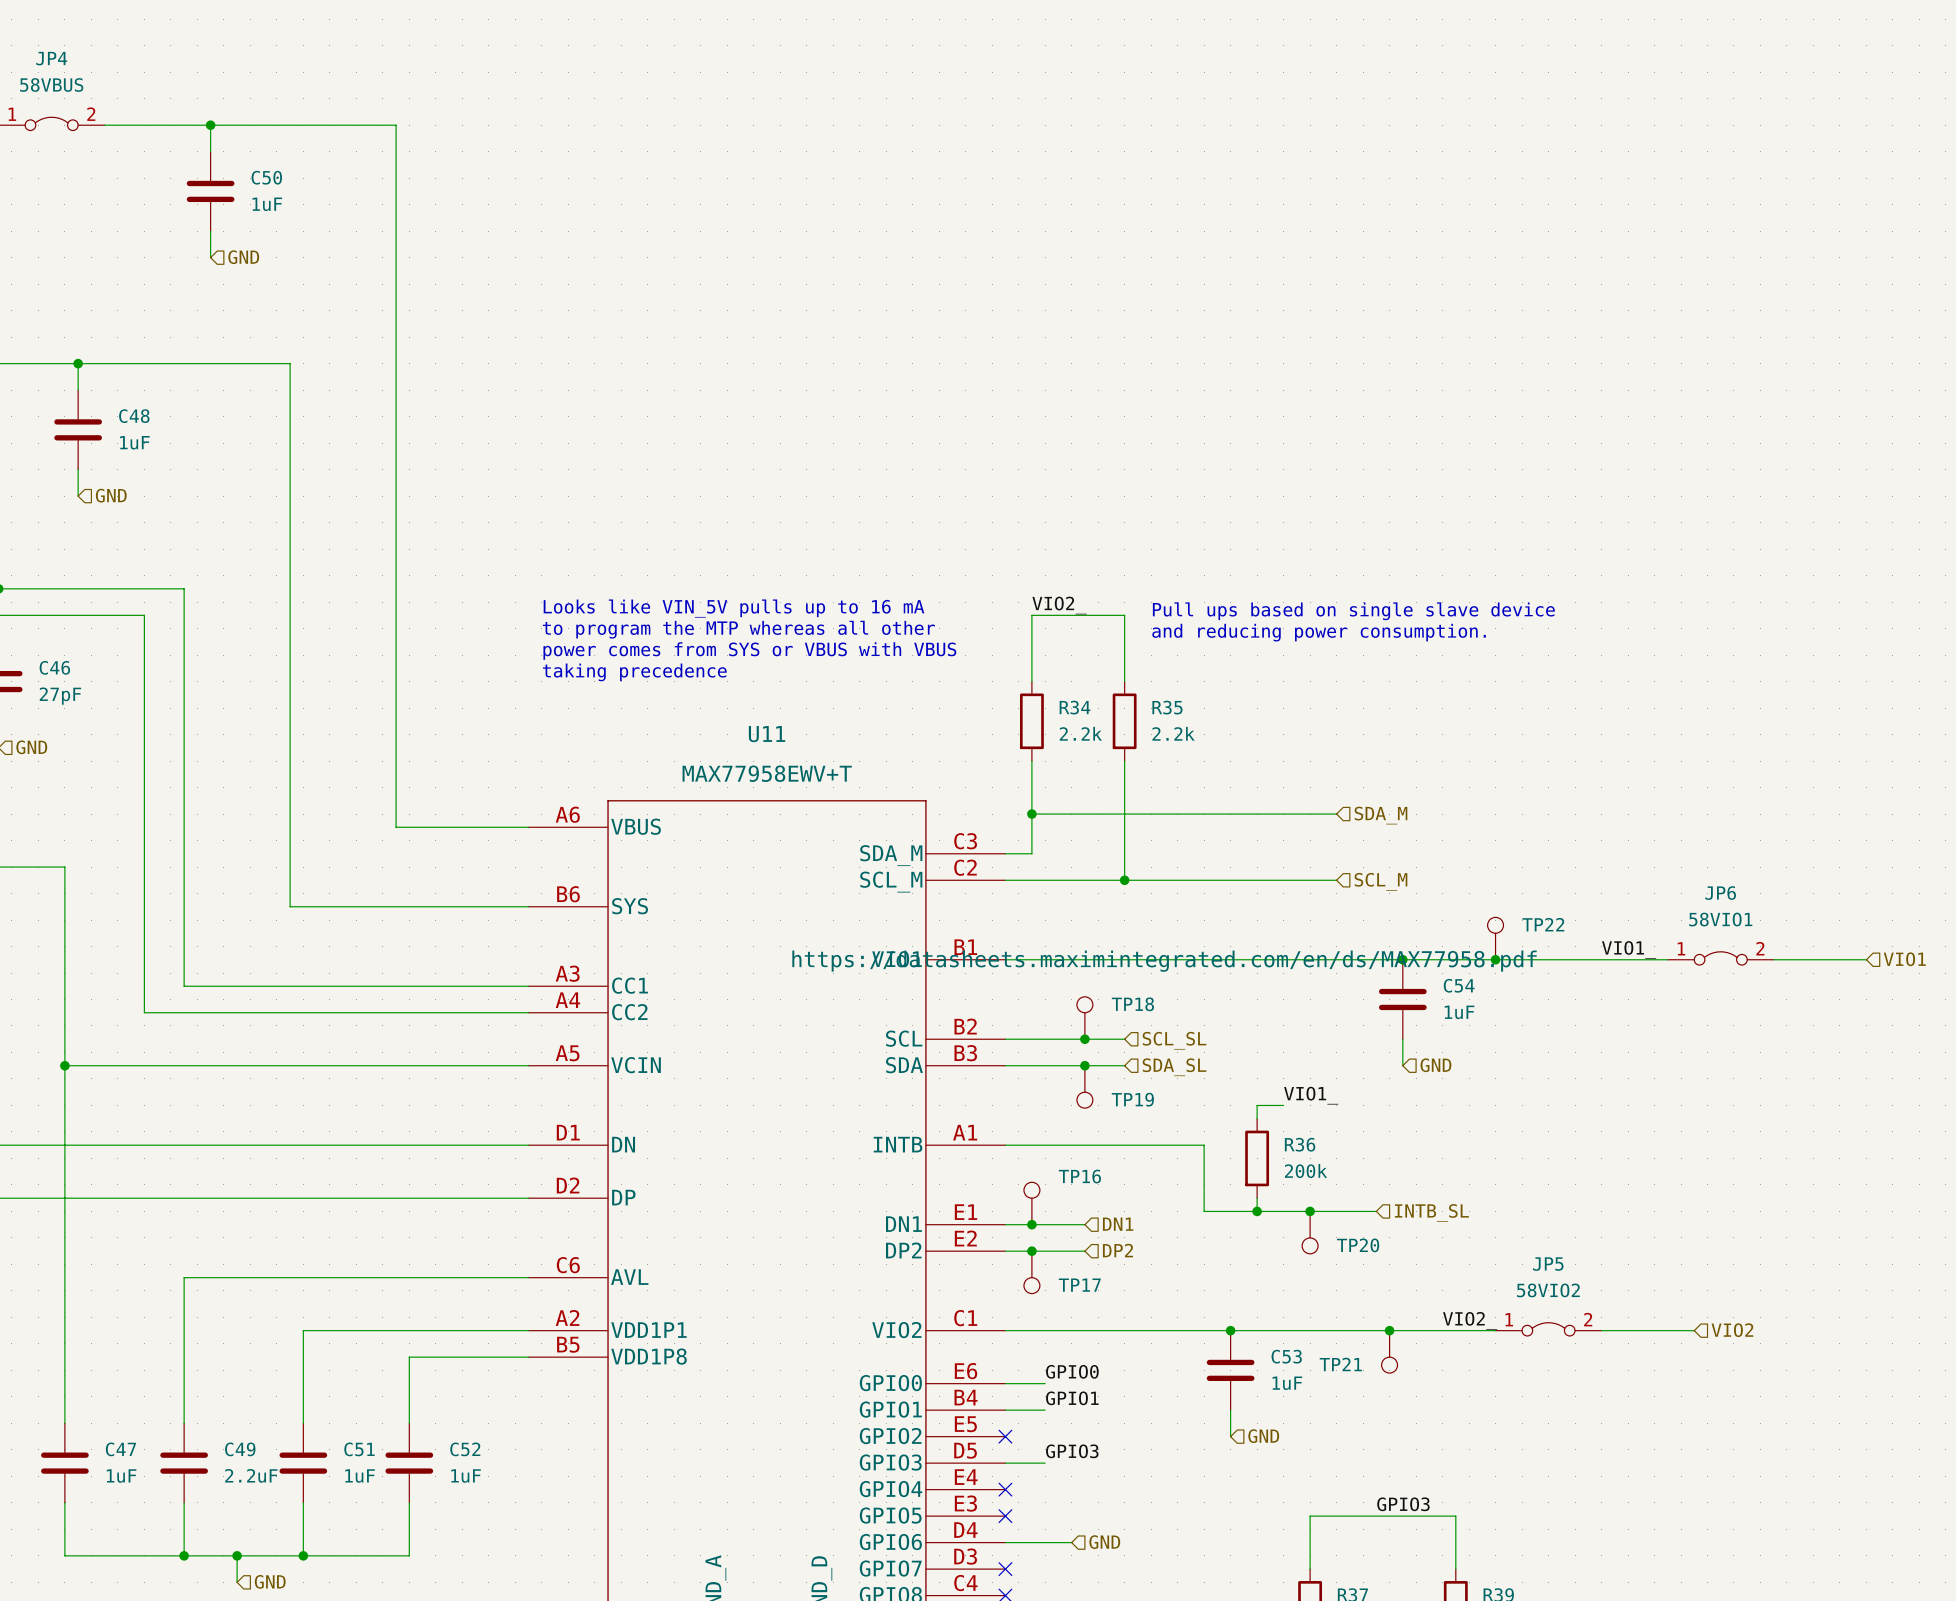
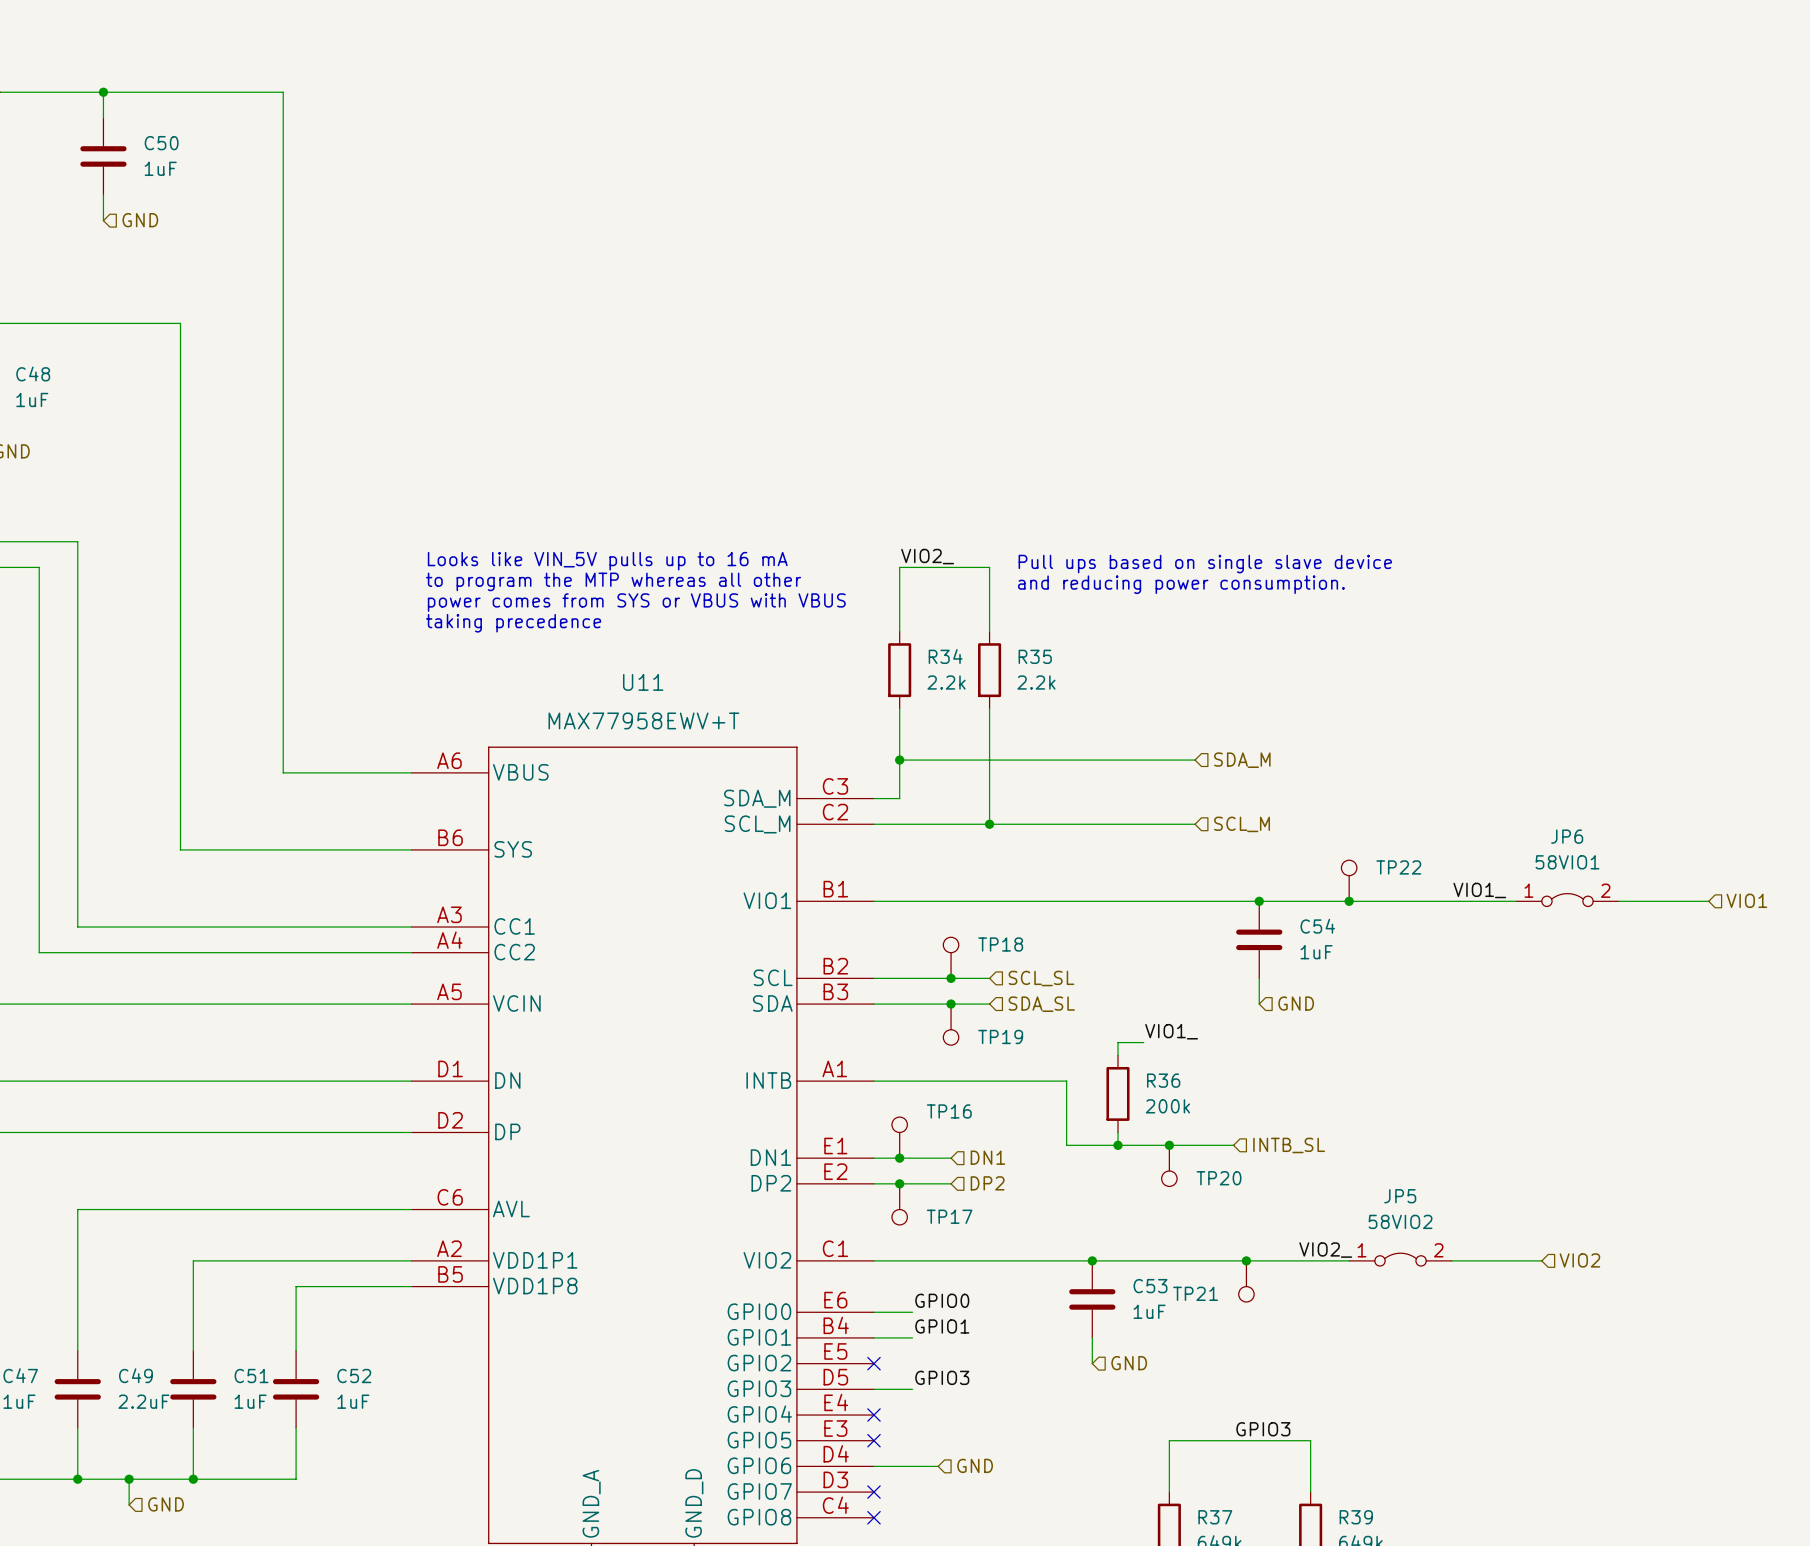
U11 text: https://datasheets.maximintegrated.com/en/ds/MAX77958.pdf (1164, 961) -> none

